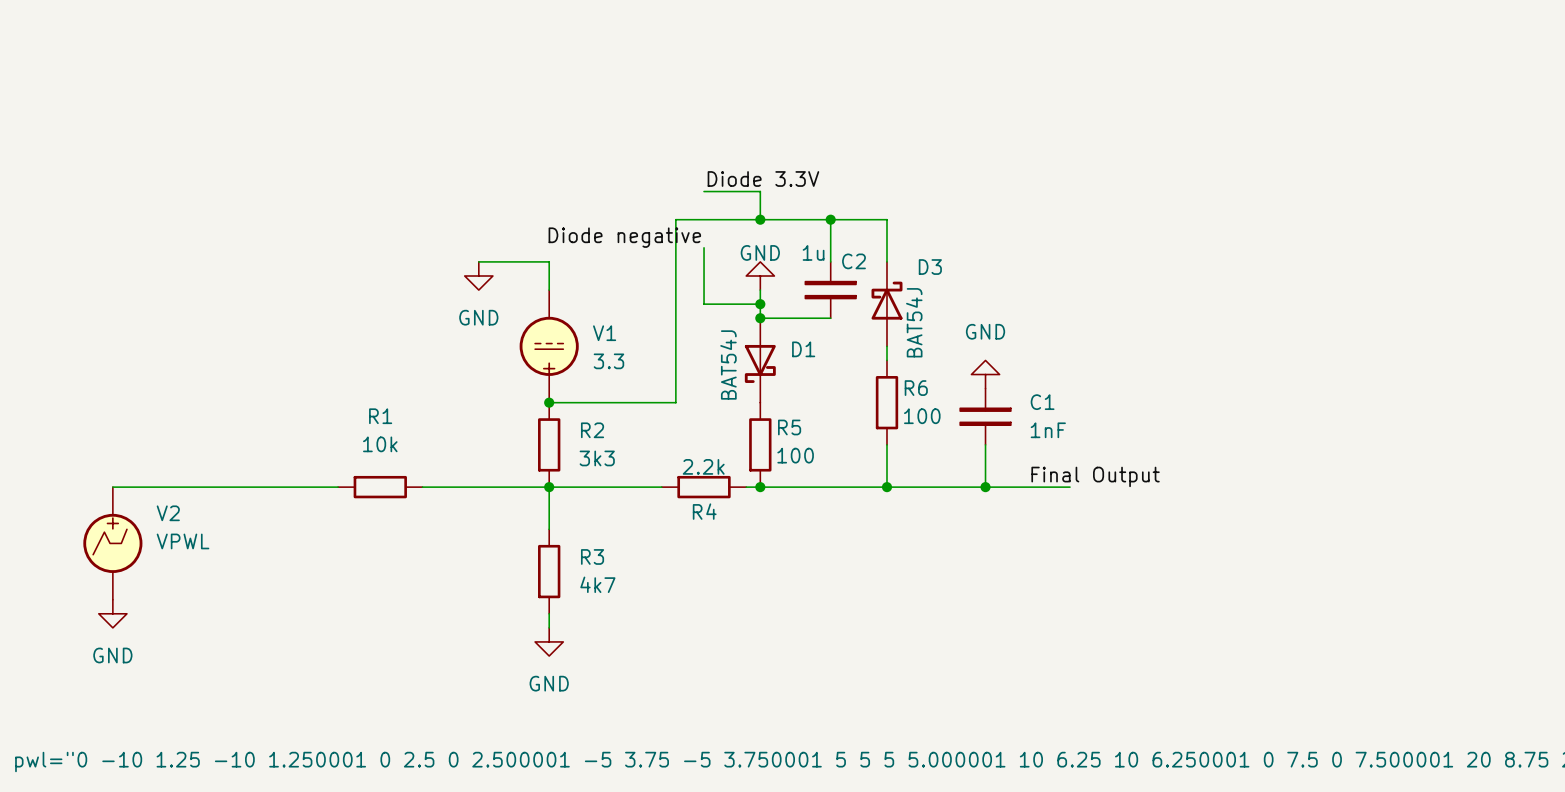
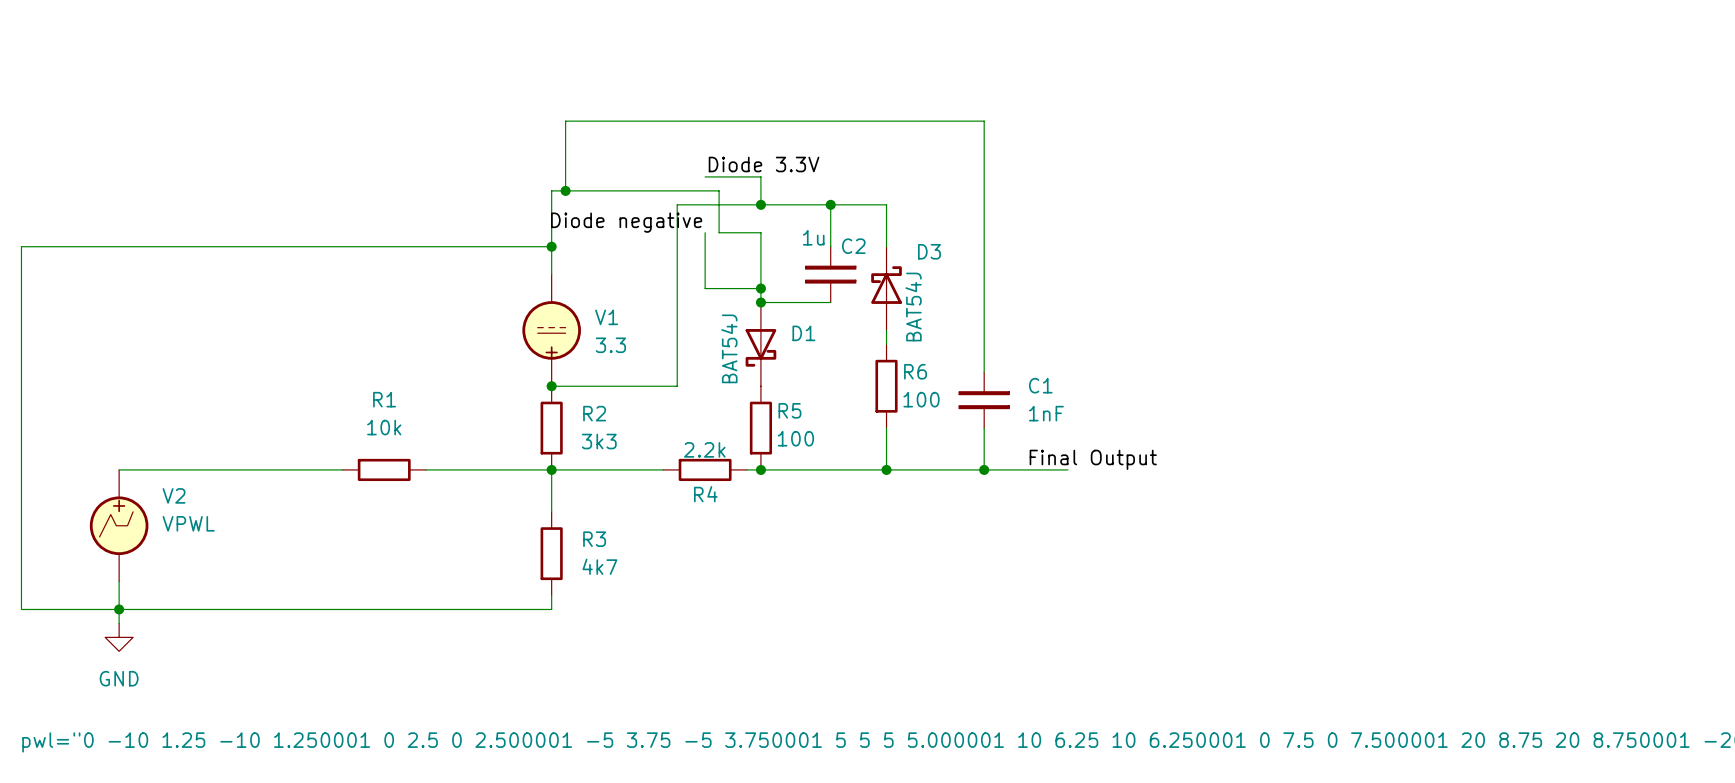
wire: none -> (565, 190) (565, 121) (984, 121) (984, 372)
junction: none -> (565, 190)
wire: none -> (481, 246) (21, 246) (21, 609) (551, 609)
wire: none -> (551, 246) (551, 190) (719, 190) (719, 232) (760, 232) (760, 274)
junction: none -> (551, 246)
power symbol: GND (478, 276) -> none
power symbol: GND (760, 276) -> none
power symbol: GND (985, 374) -> none
wire: none -> (119, 581) (119, 623)
power symbol position: GND (112, 613) -> GND (119, 637)
junction: none -> (119, 609)
power symbol: GND (549, 641) -> none

